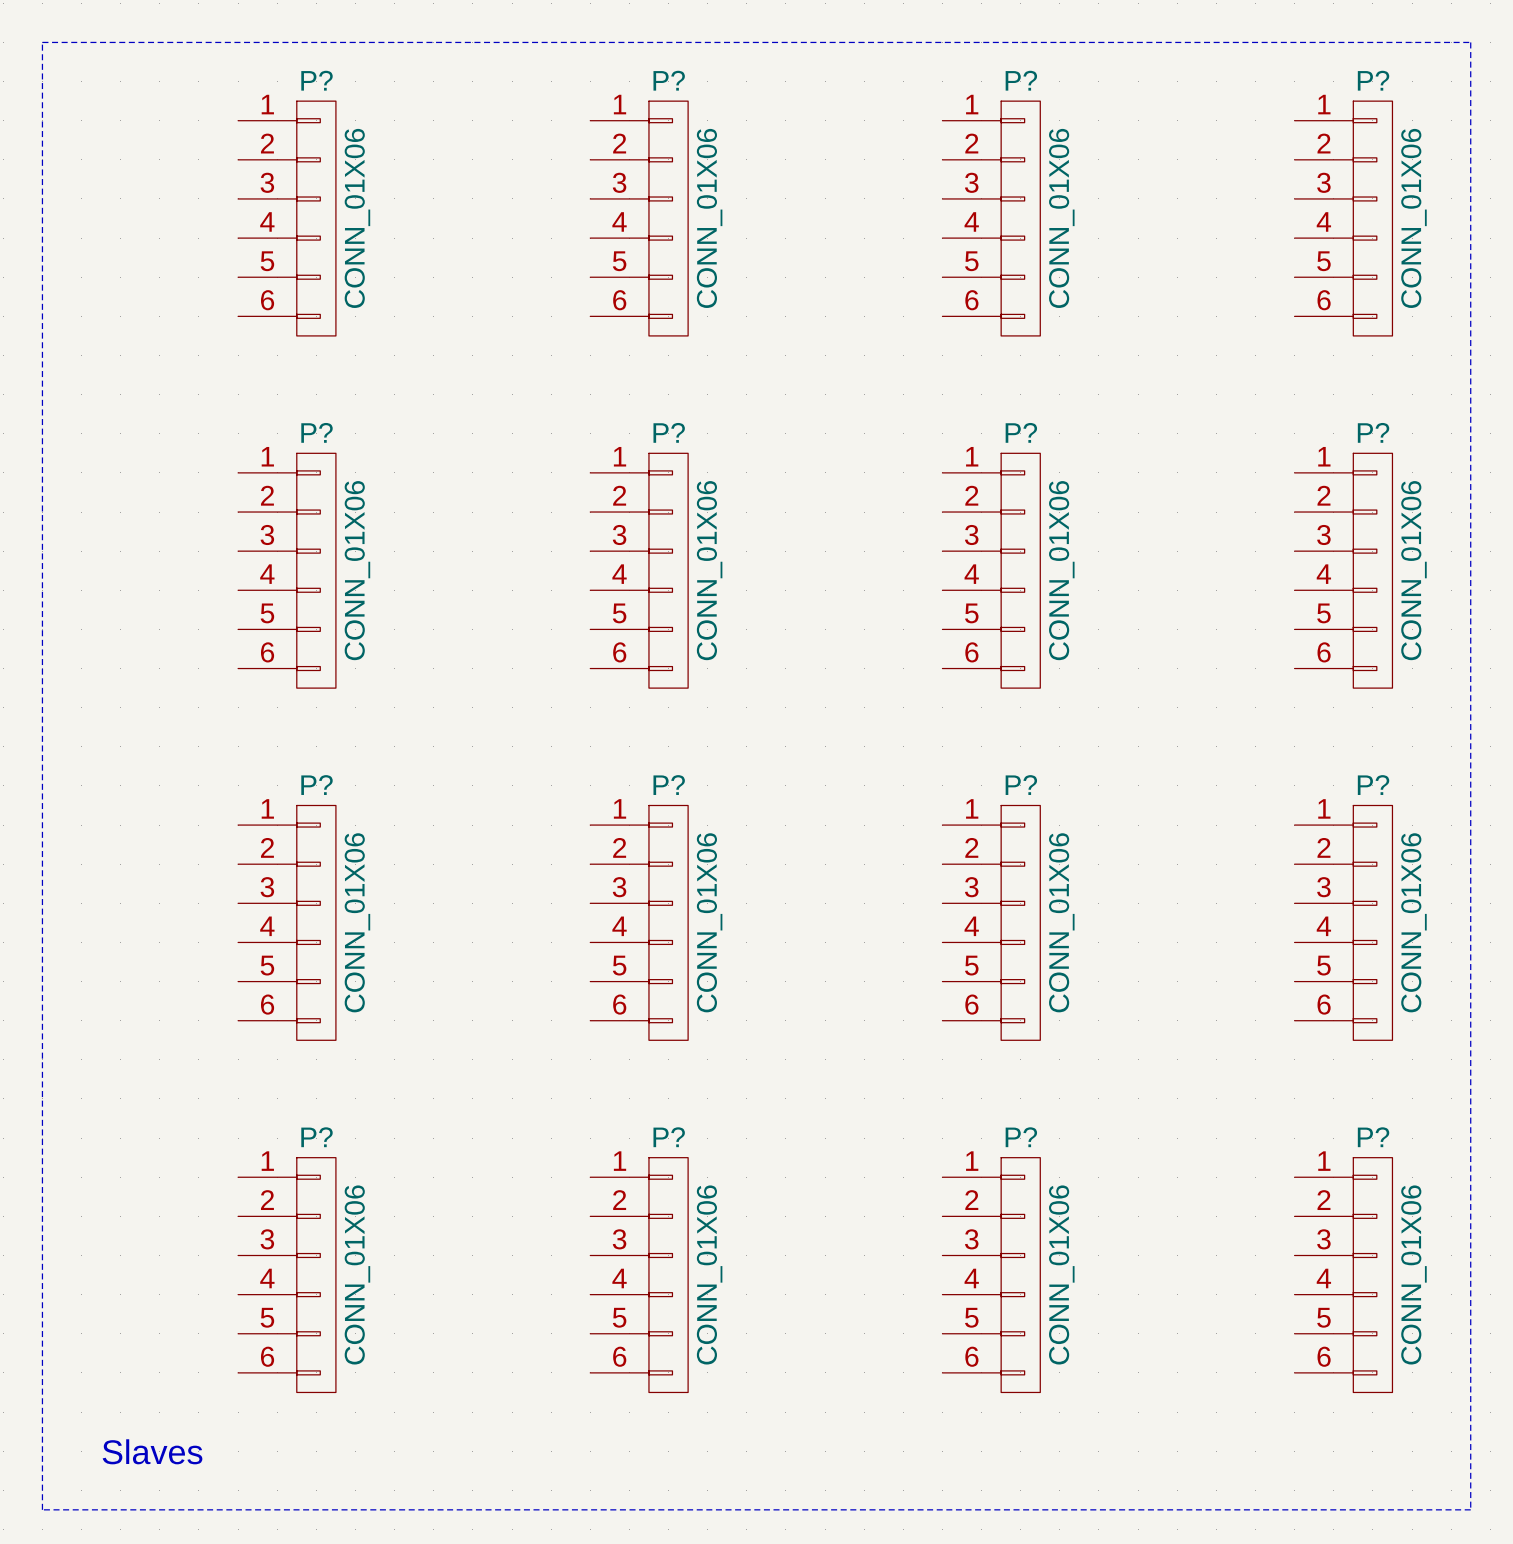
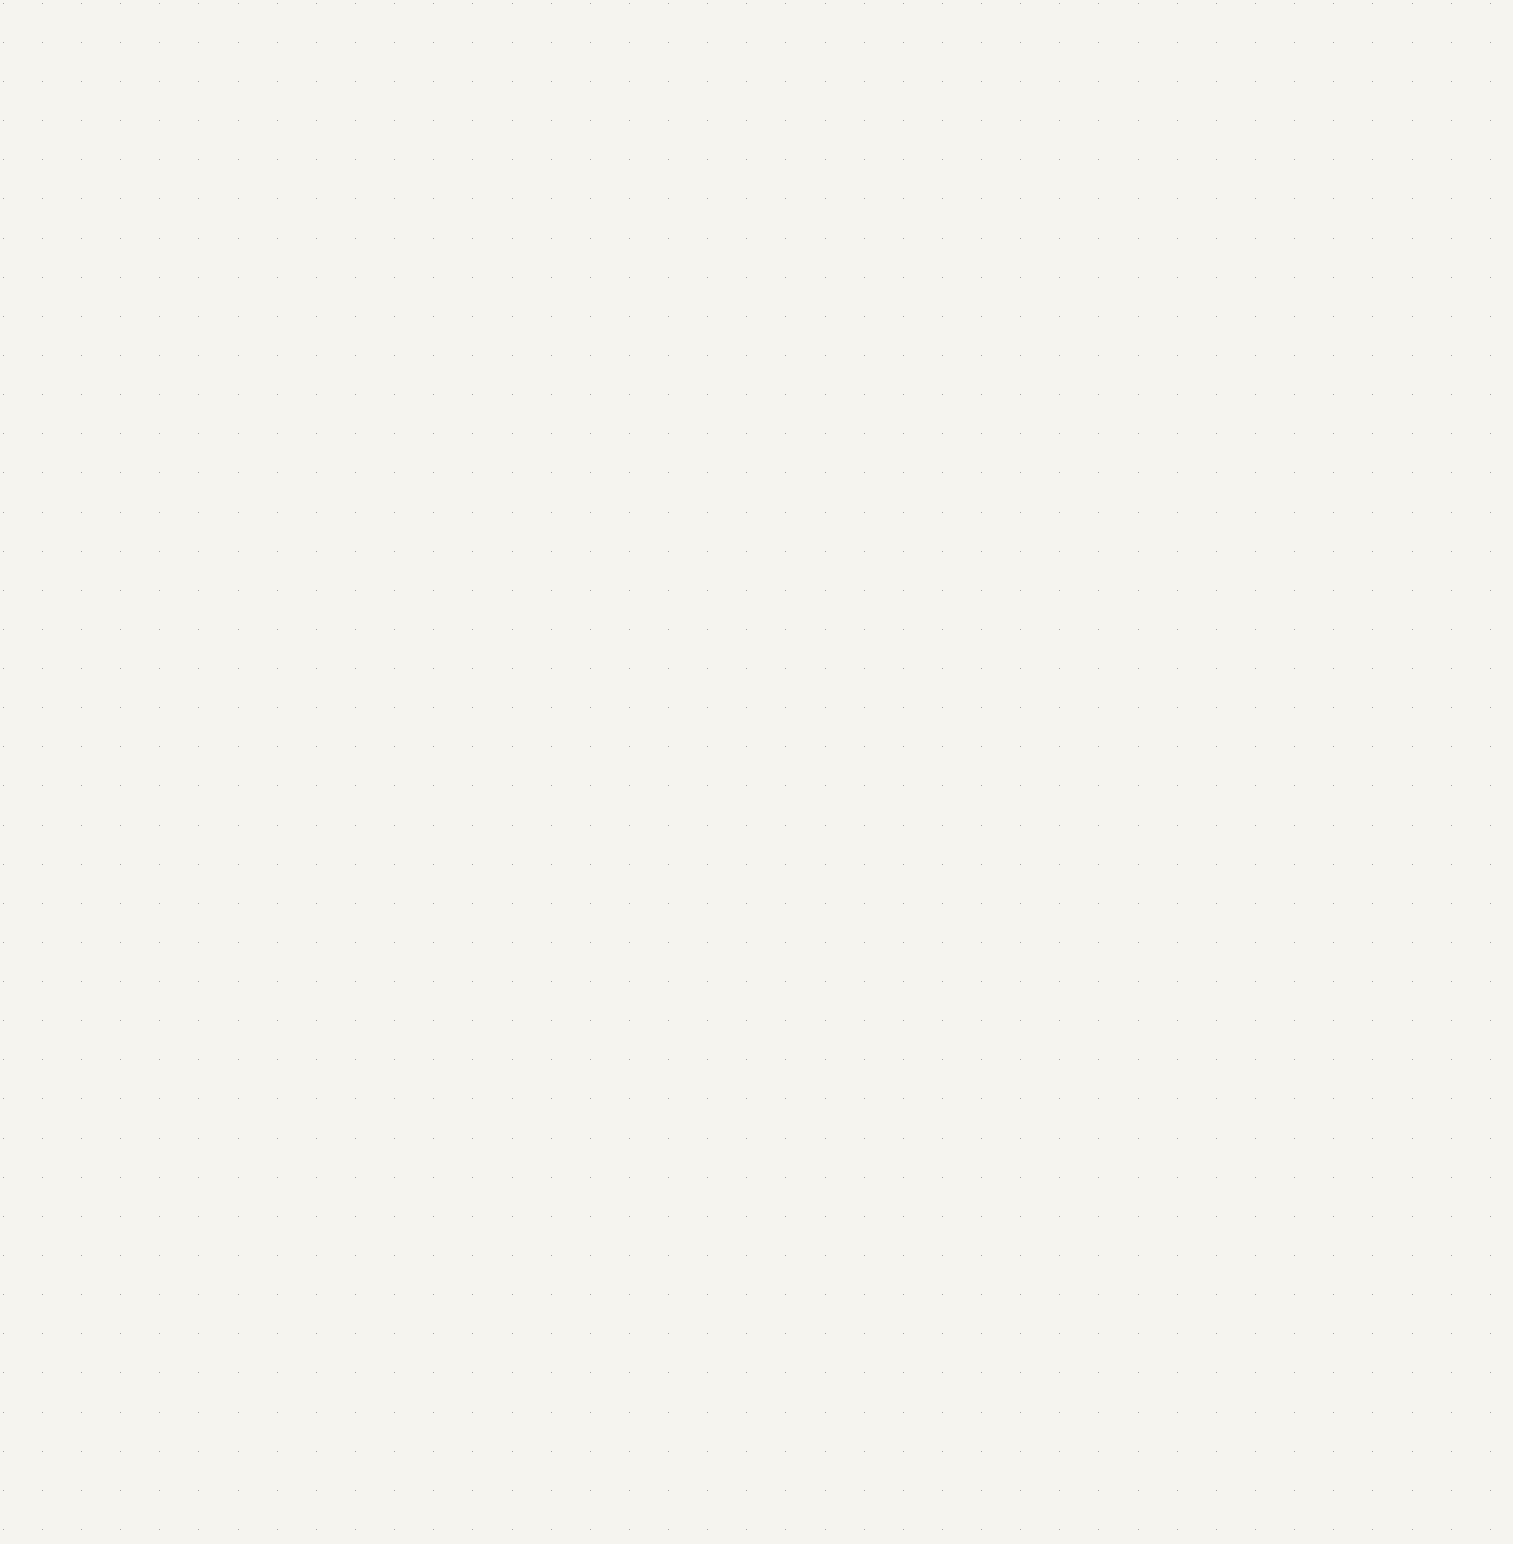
line: (42, 42) (42, 1509) (1470, 1509) (1470, 42) (42, 42) -> none
P?: CONN_01X06 (287, 218) -> none
P?: CONN_01X06 (639, 218) -> none
P?: CONN_01X06 (991, 218) -> none
P?: CONN_01X06 (1343, 218) -> none
P?: CONN_01X06 (287, 570) -> none
P?: CONN_01X06 (639, 570) -> none
P?: CONN_01X06 (991, 570) -> none
P?: CONN_01X06 (1343, 570) -> none
P?: CONN_01X06 (287, 922) -> none
P?: CONN_01X06 (639, 922) -> none
P?: CONN_01X06 (991, 922) -> none
P?: CONN_01X06 (1343, 922) -> none
P?: CONN_01X06 (287, 1275) -> none
P?: CONN_01X06 (639, 1275) -> none
P?: CONN_01X06 (991, 1275) -> none
P?: CONN_01X06 (1343, 1275) -> none
text: Slaves (152, 1451) -> none

